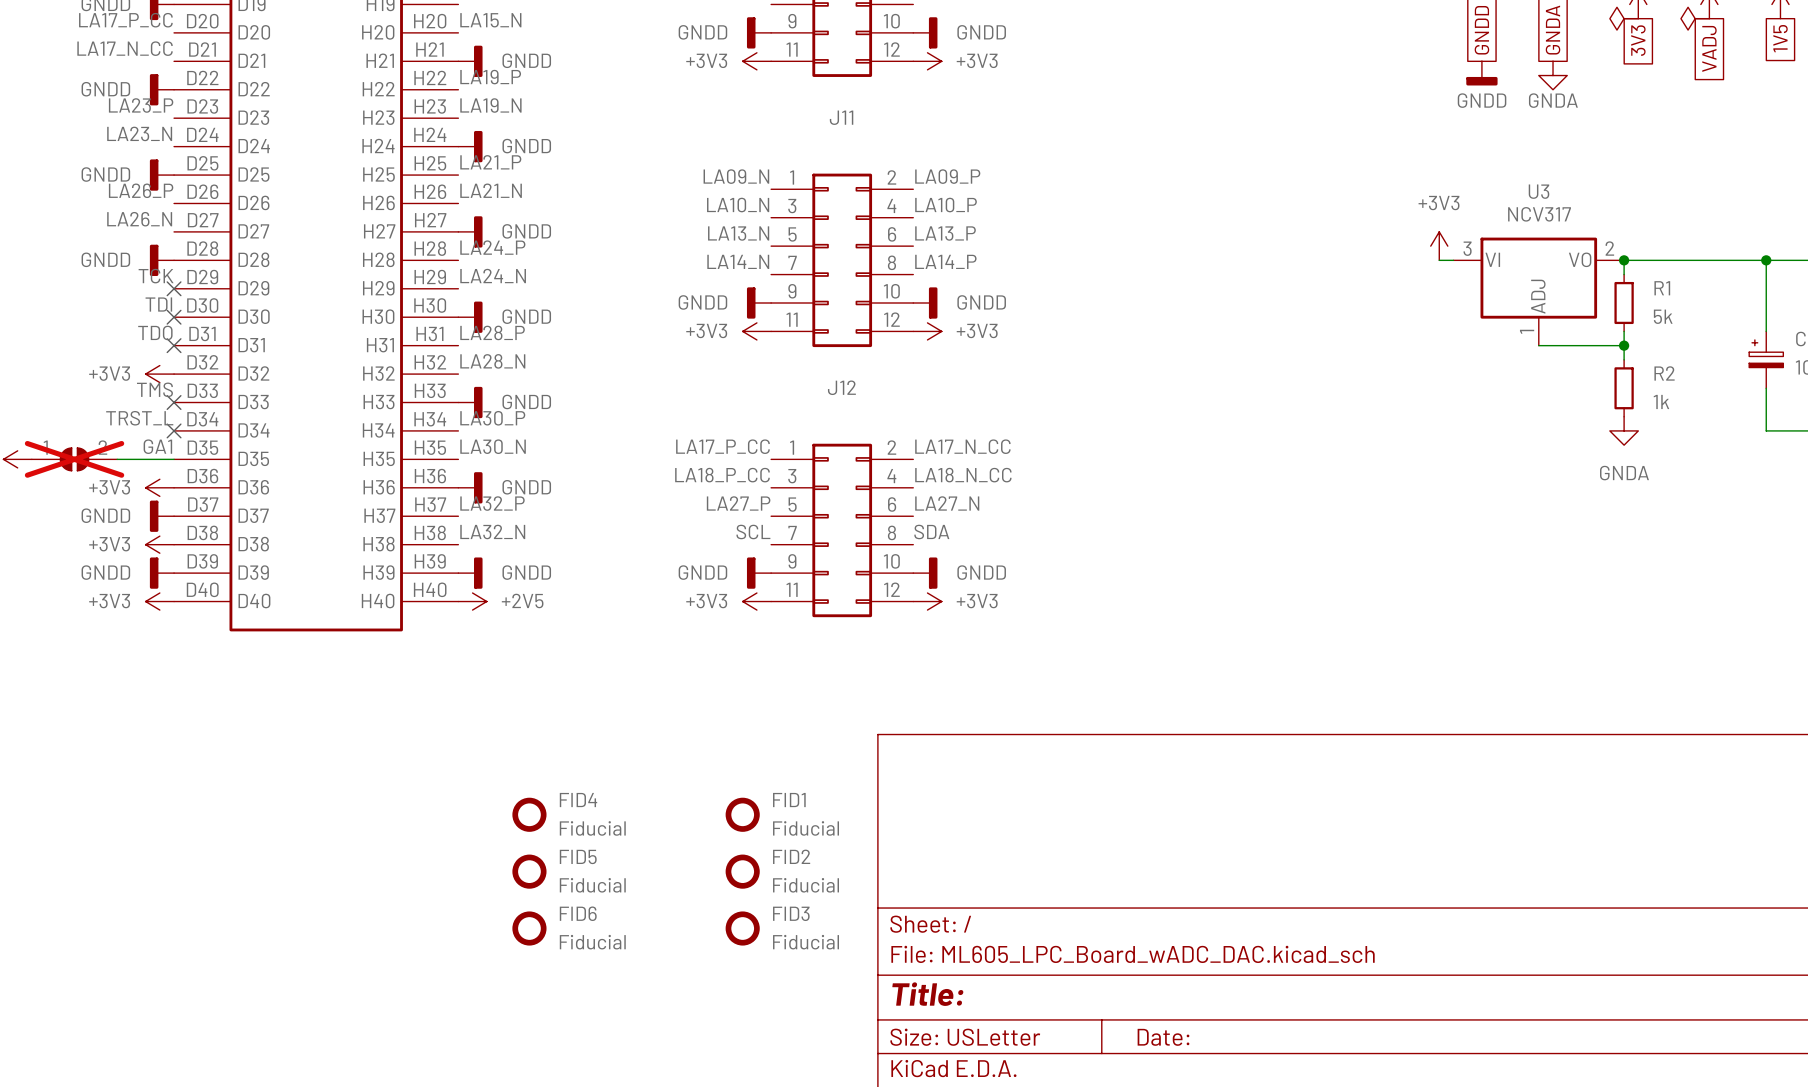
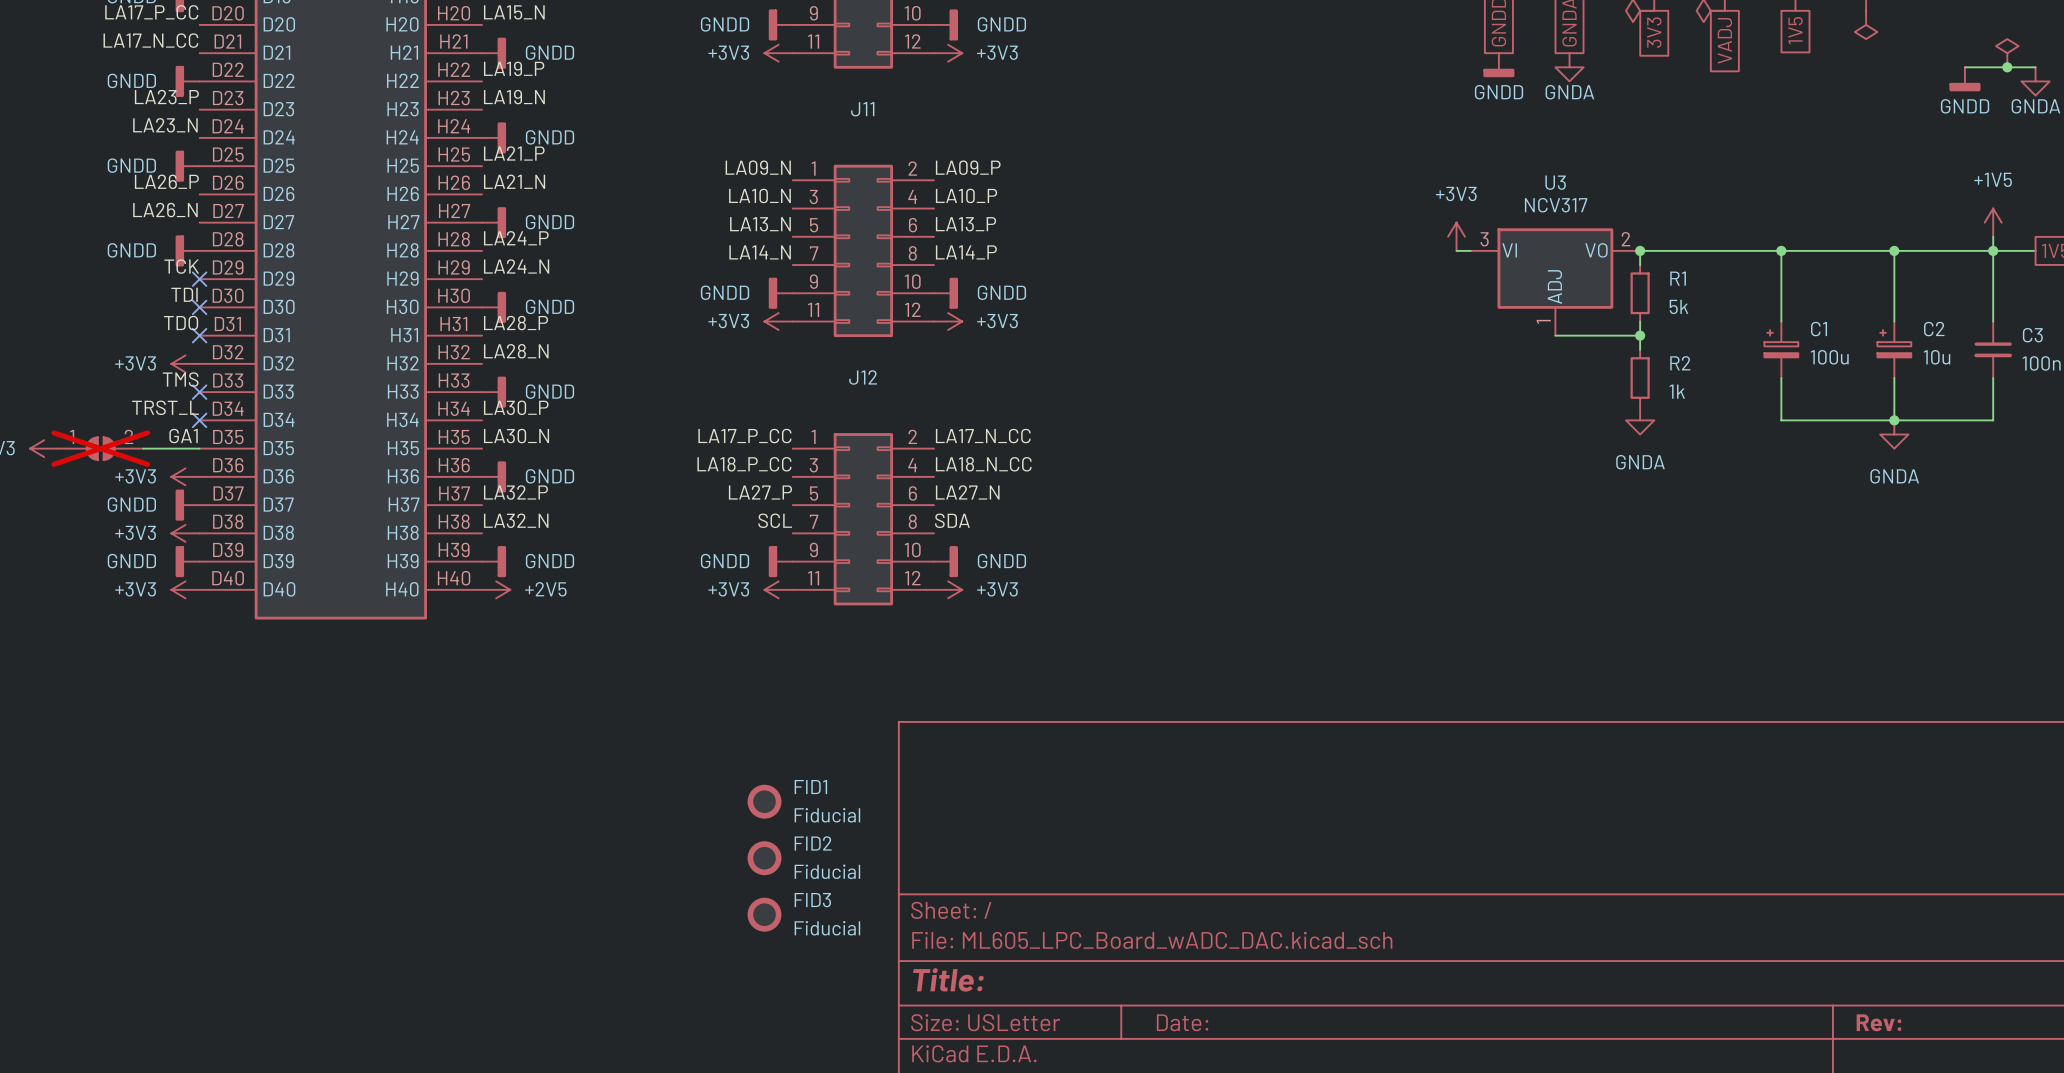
FID4: Fiducial (529, 814) -> none
FID5: Fiducial (529, 871) -> none
FID6: Fiducial (529, 928) -> none

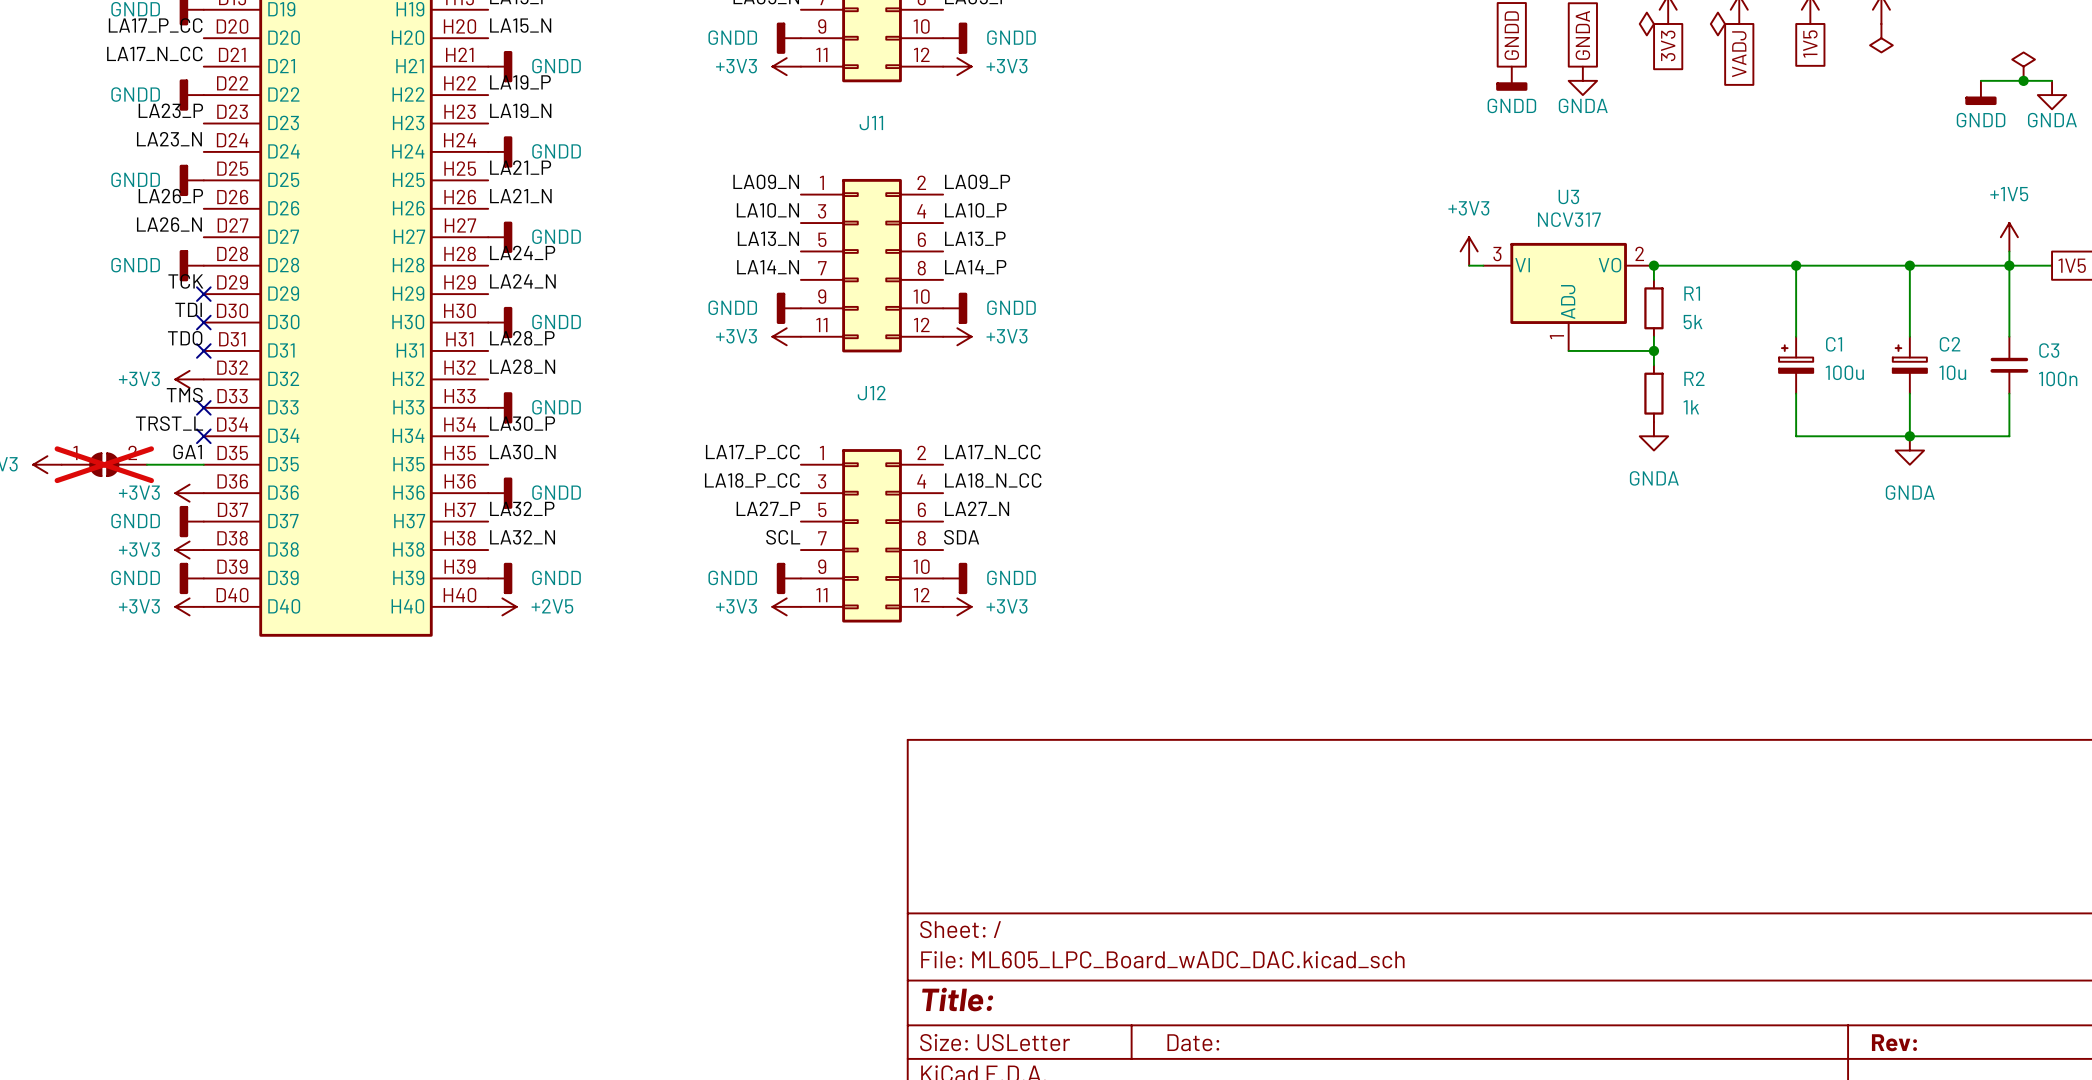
FID1: Fiducial (764, 801) -> none
FID2: Fiducial (764, 858) -> none
FID3: Fiducial (764, 914) -> none

